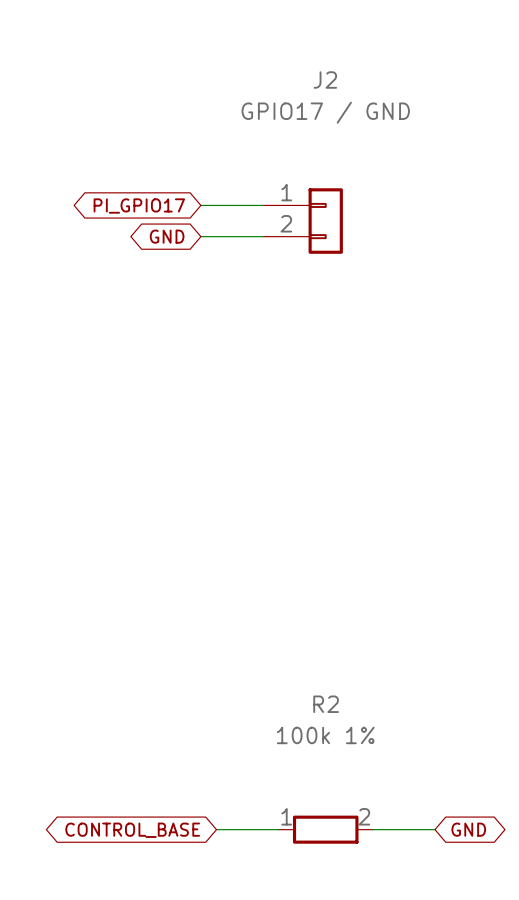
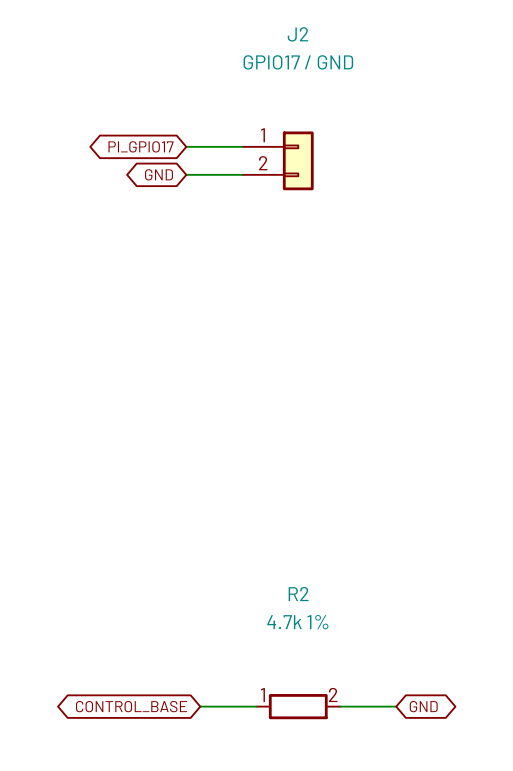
R2 value: 100k 1% (325, 735) -> 4.7k 1% (297, 622)

